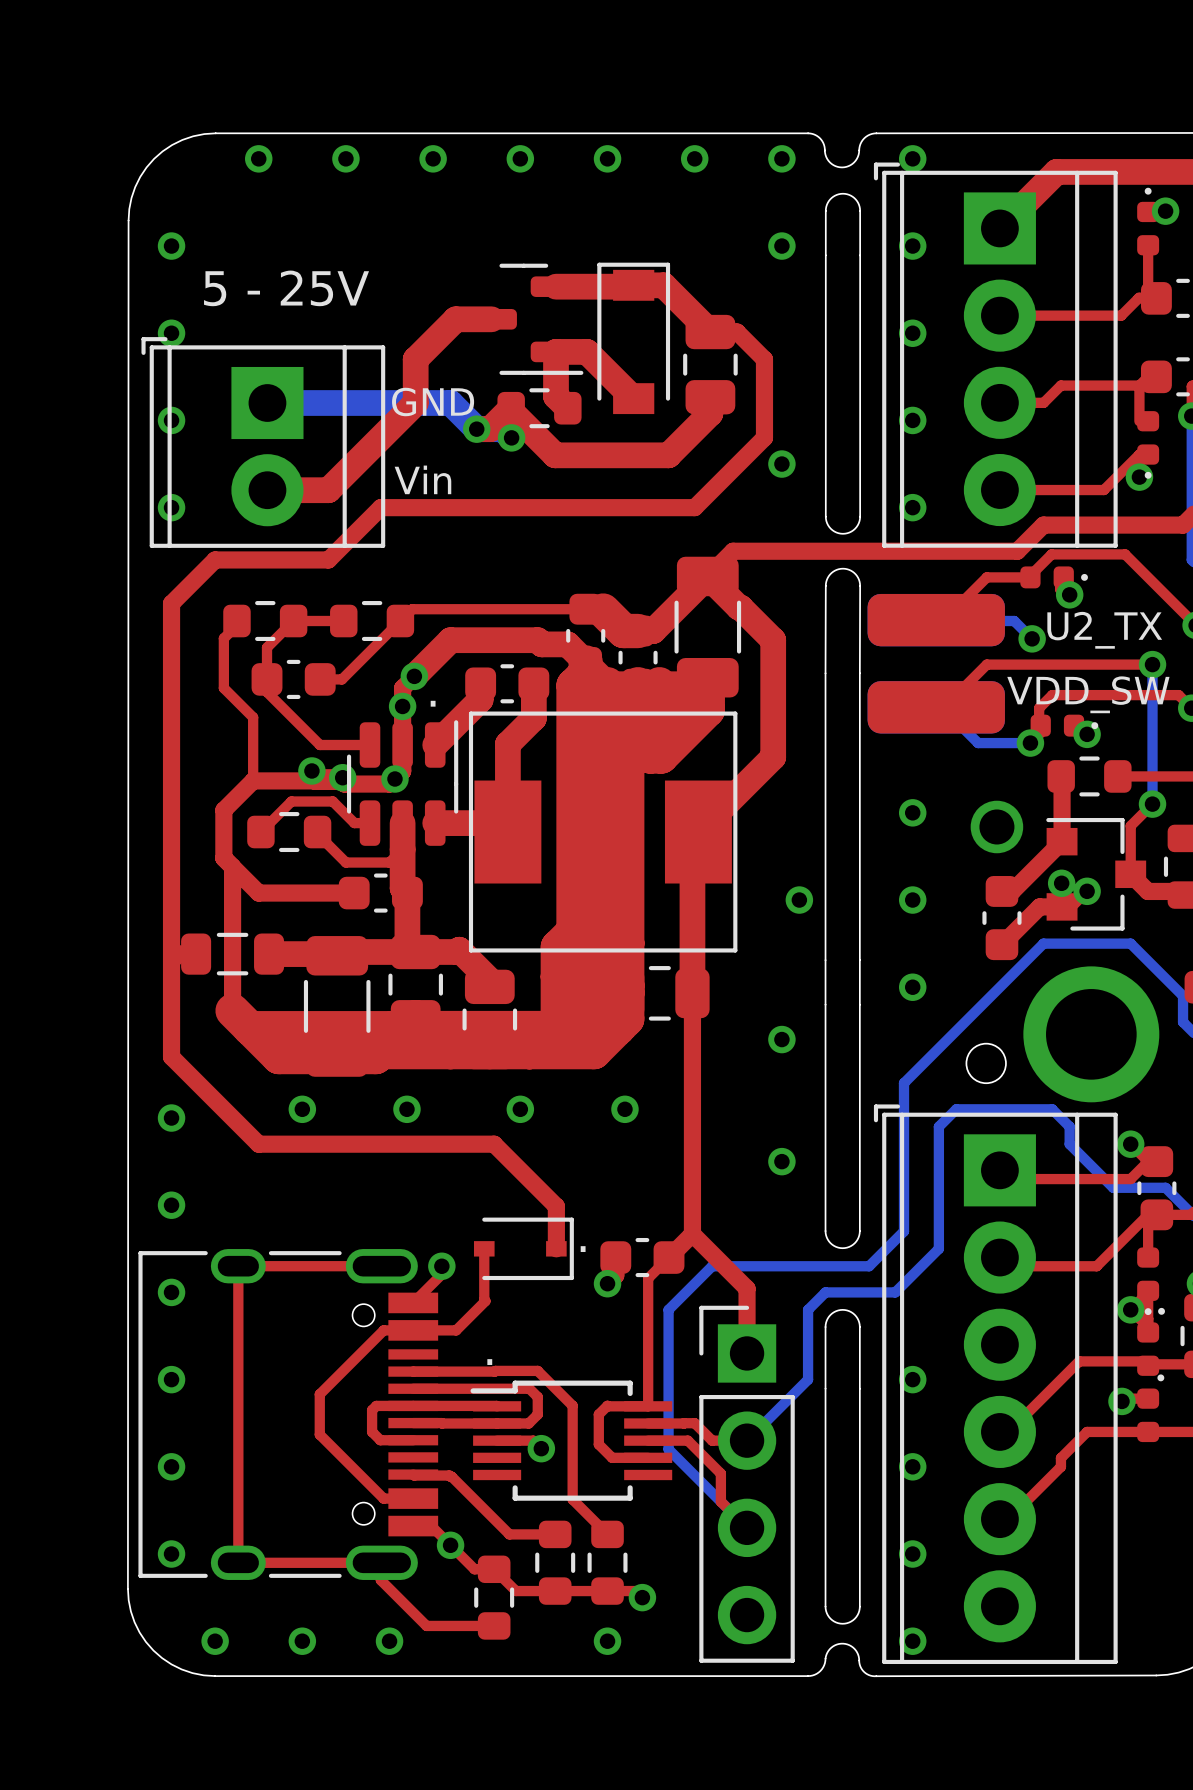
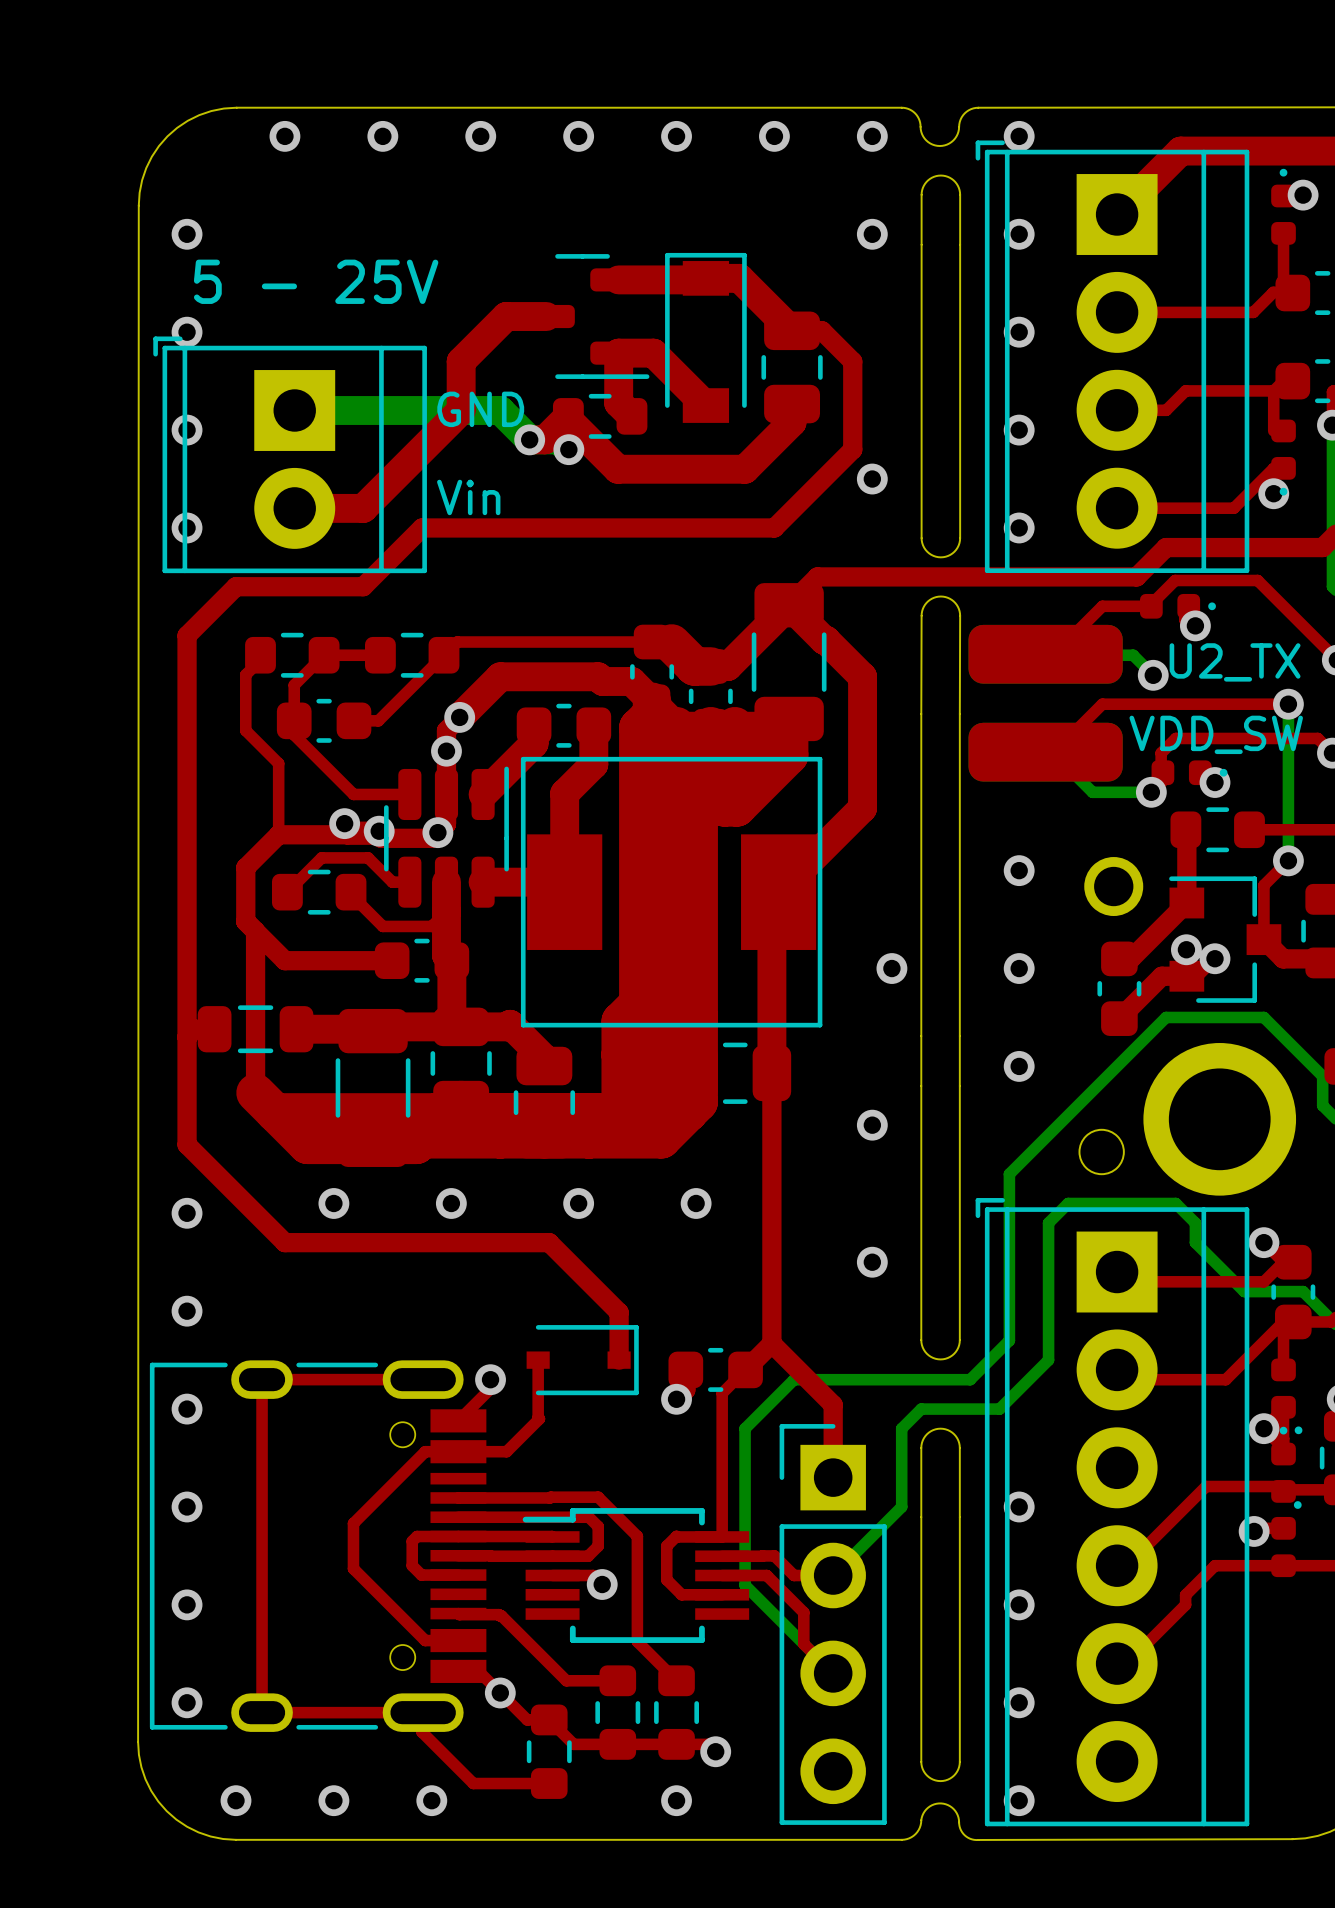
text: . (433, 703) -> none
text: . (583, 1249) -> none
text: . (489, 1362) -> none

